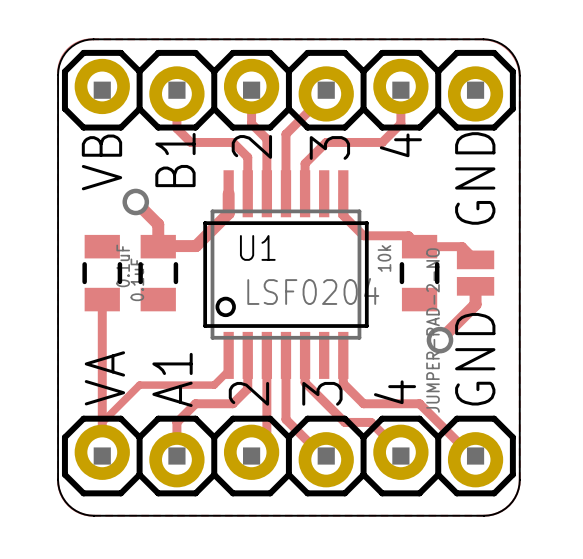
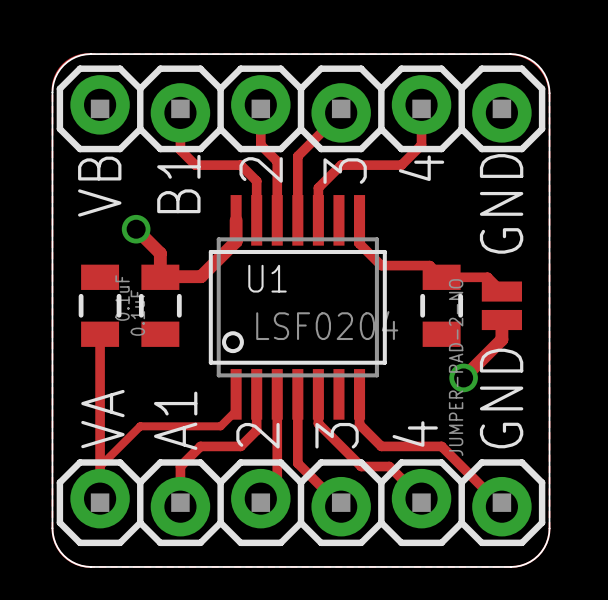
part value: 10k (384, 258) -> none

